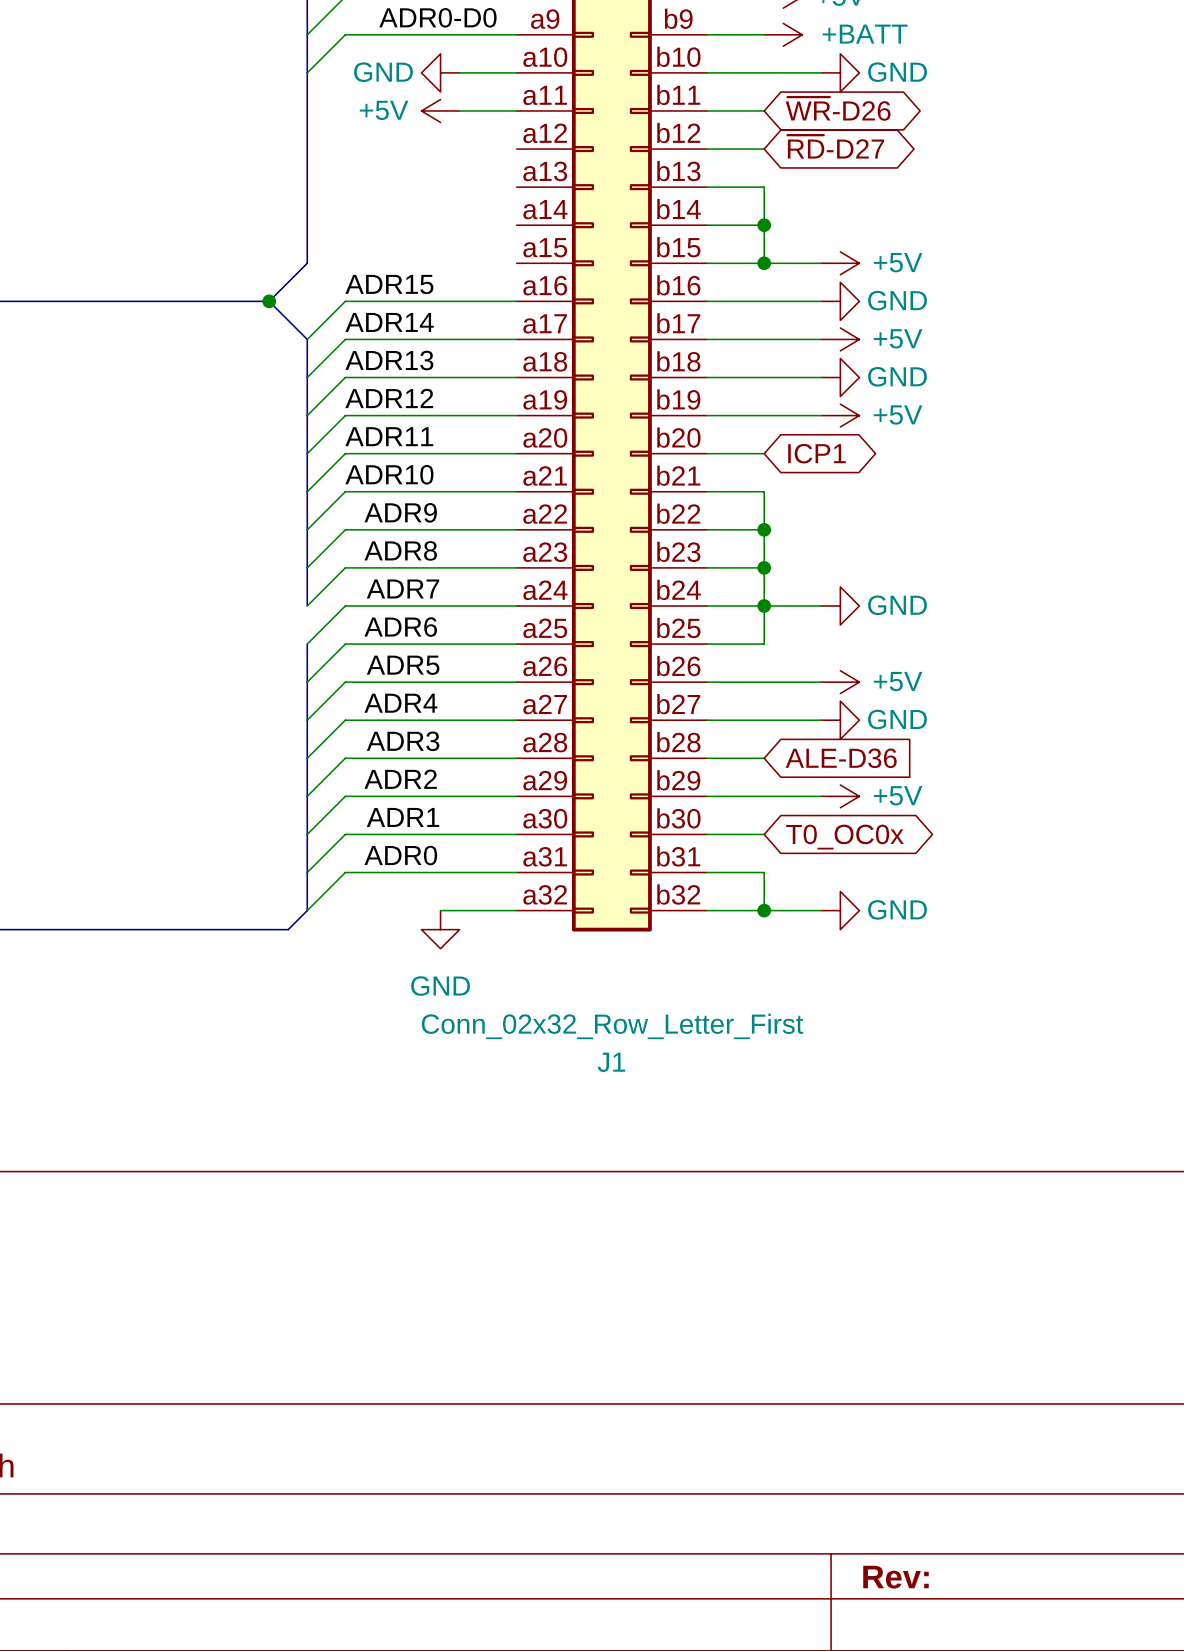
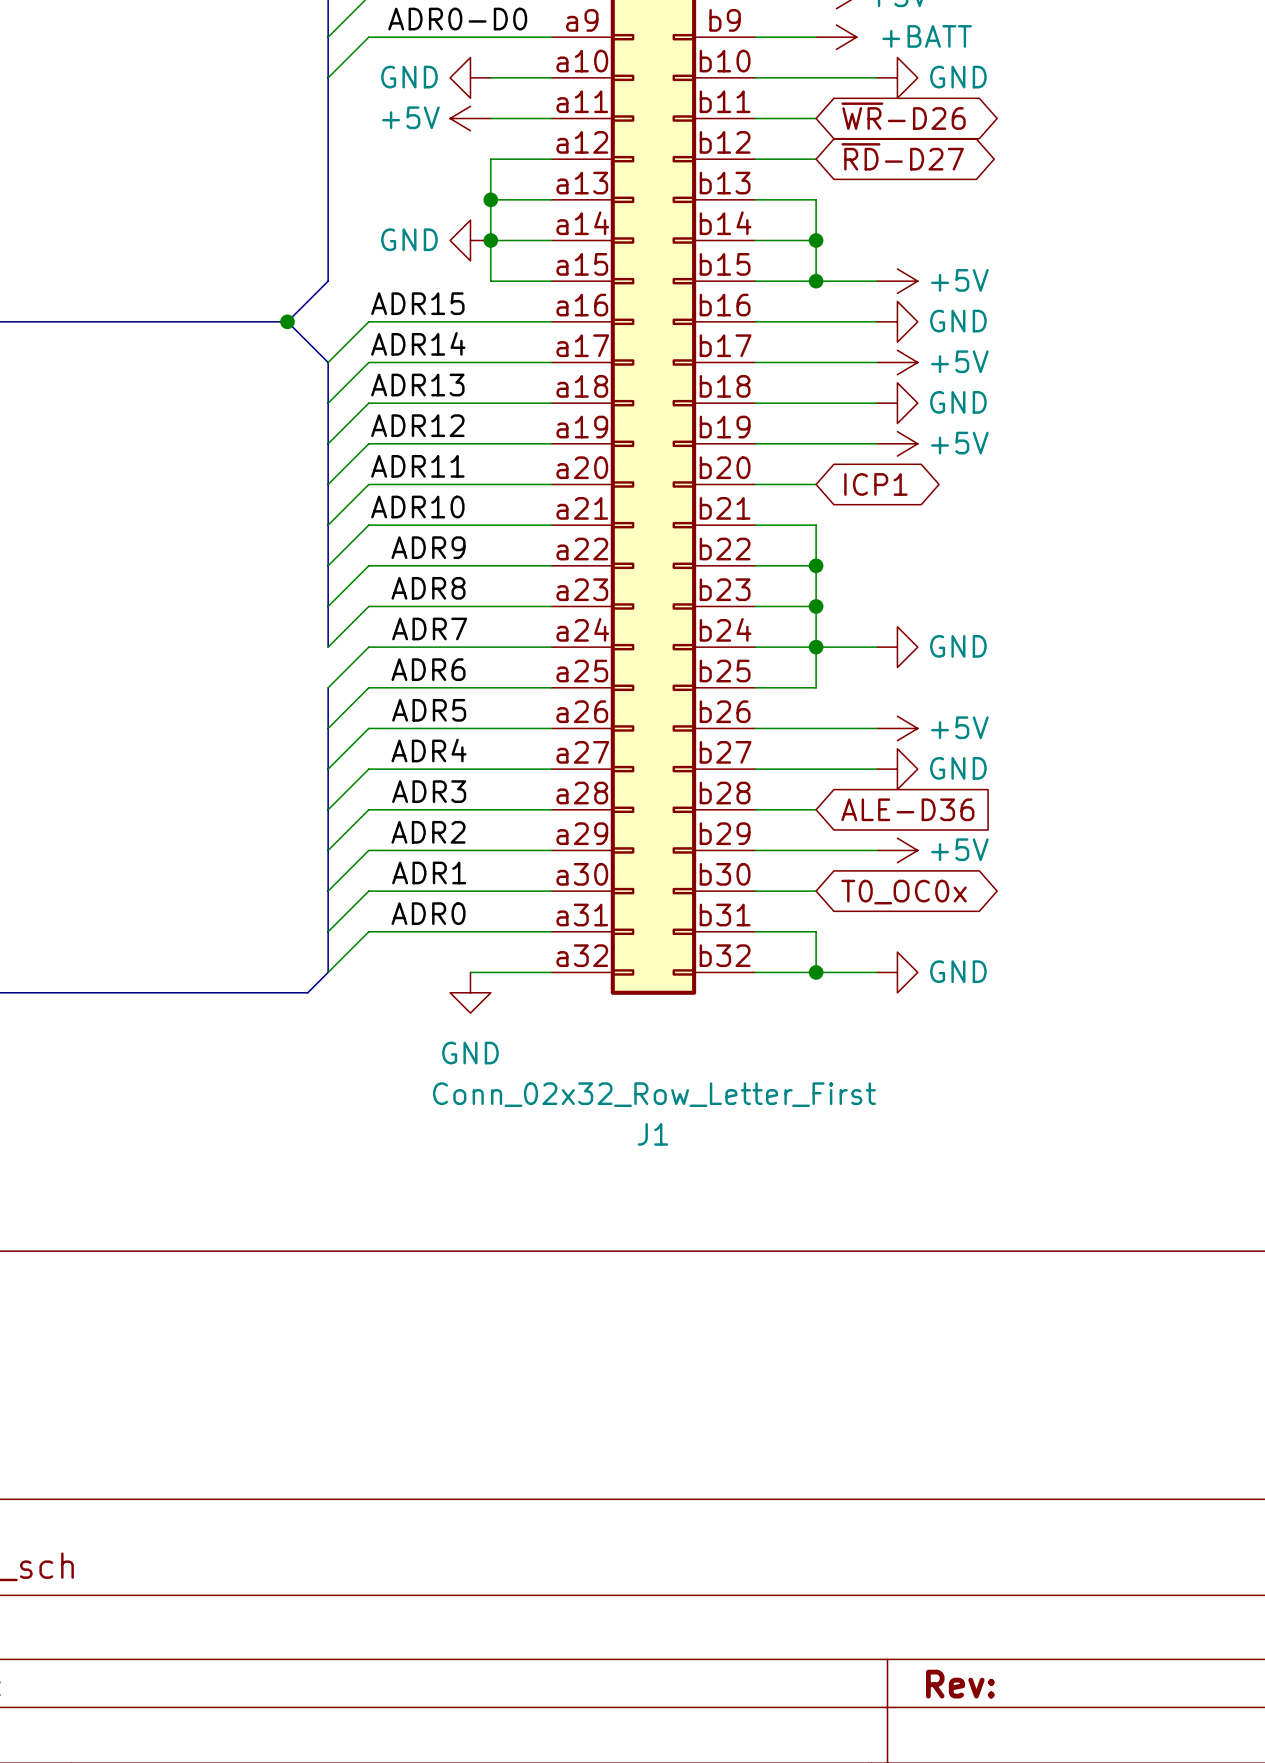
wire: none -> (551, 159) (490, 159) (490, 281) (551, 281)
wire: none -> (490, 199) (551, 199)
junction: none -> (490, 199)
power symbol: none -> GND (470, 240)
wire: none -> (490, 240) (551, 240)
junction: none -> (490, 240)

